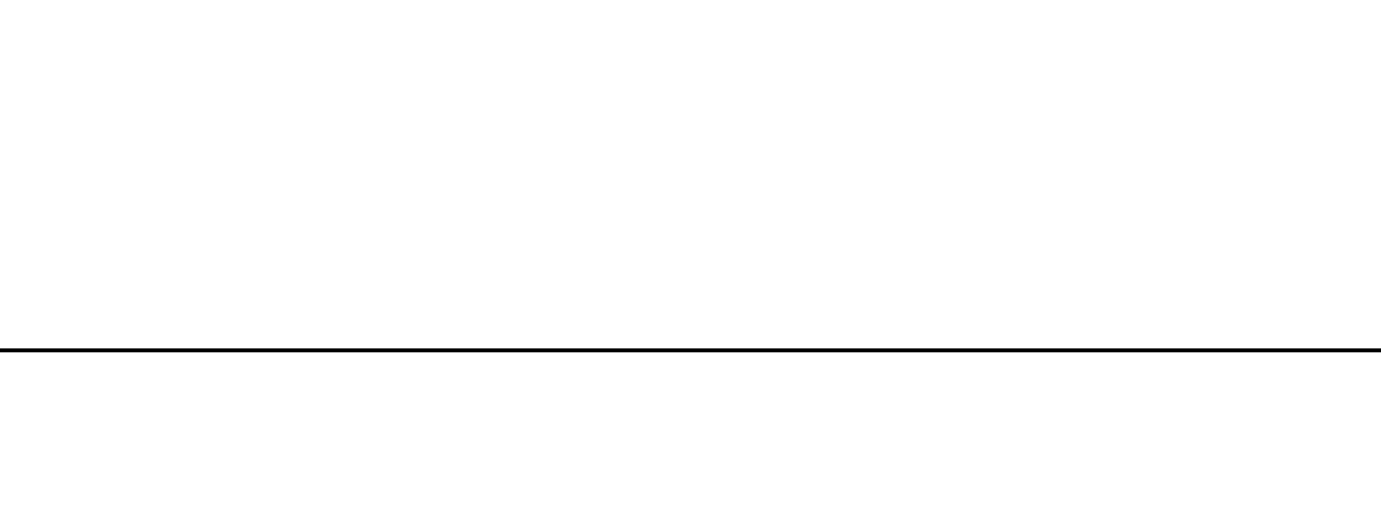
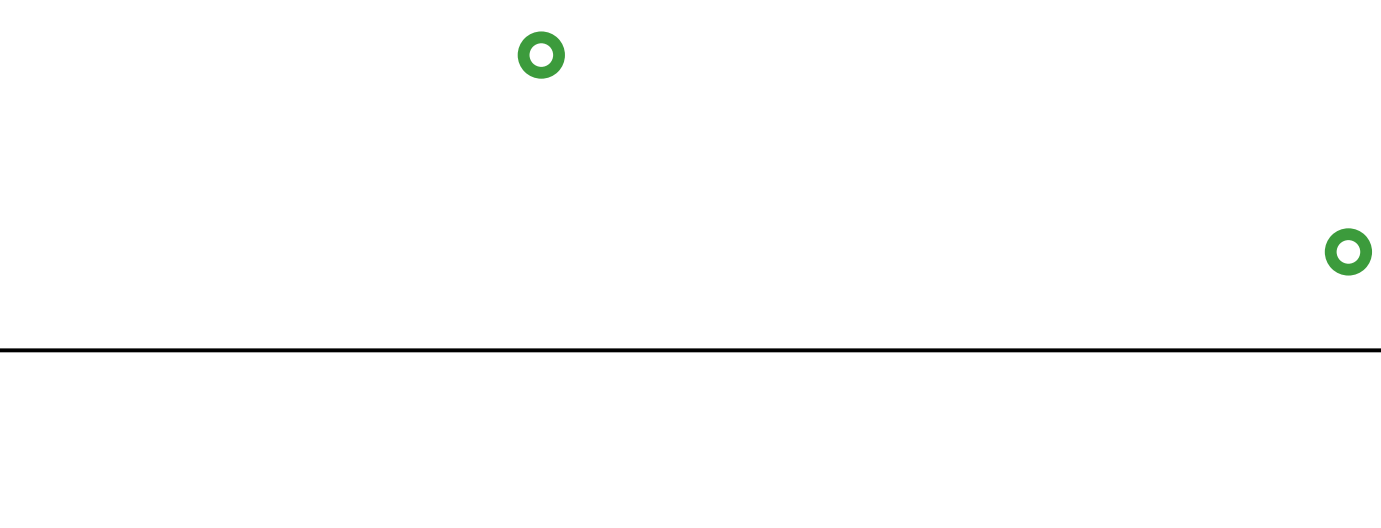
via: none -> (541, 55)
via: none -> (1348, 251)

